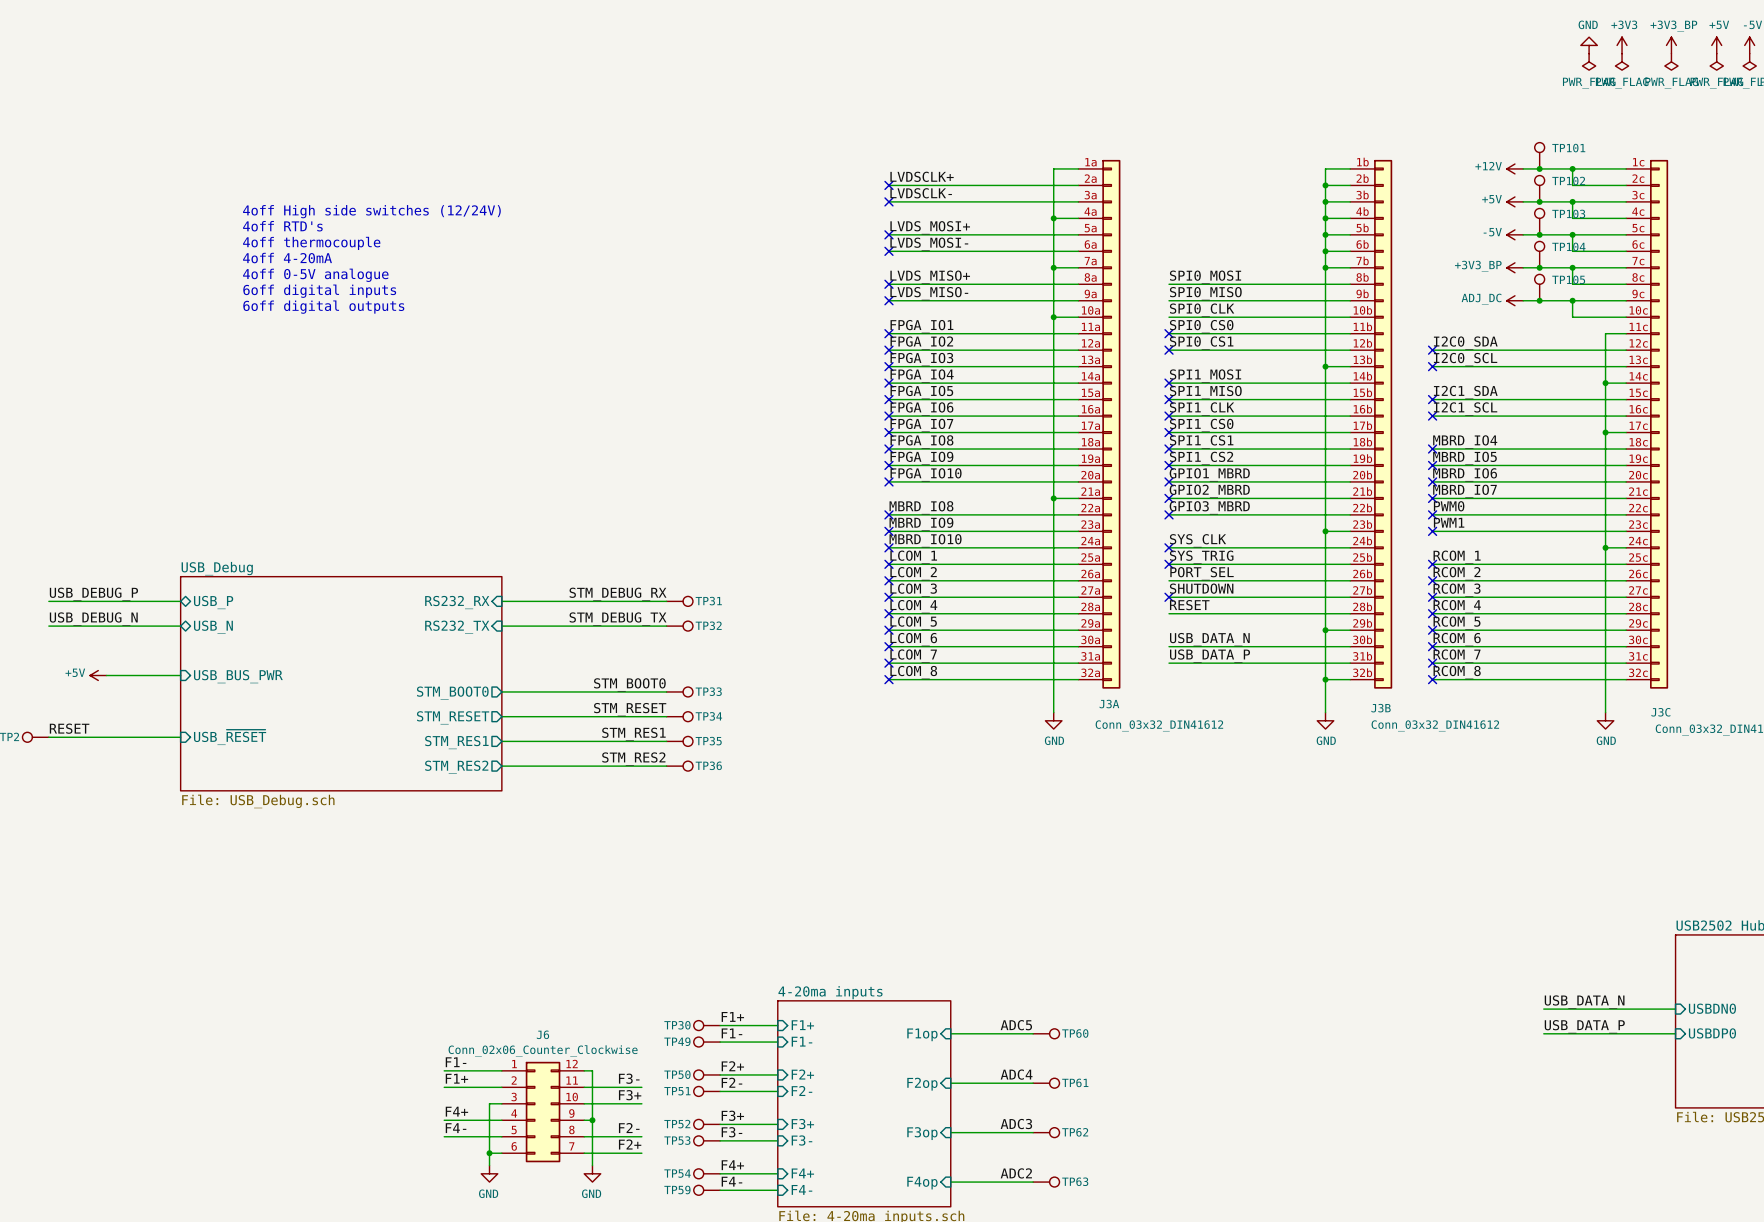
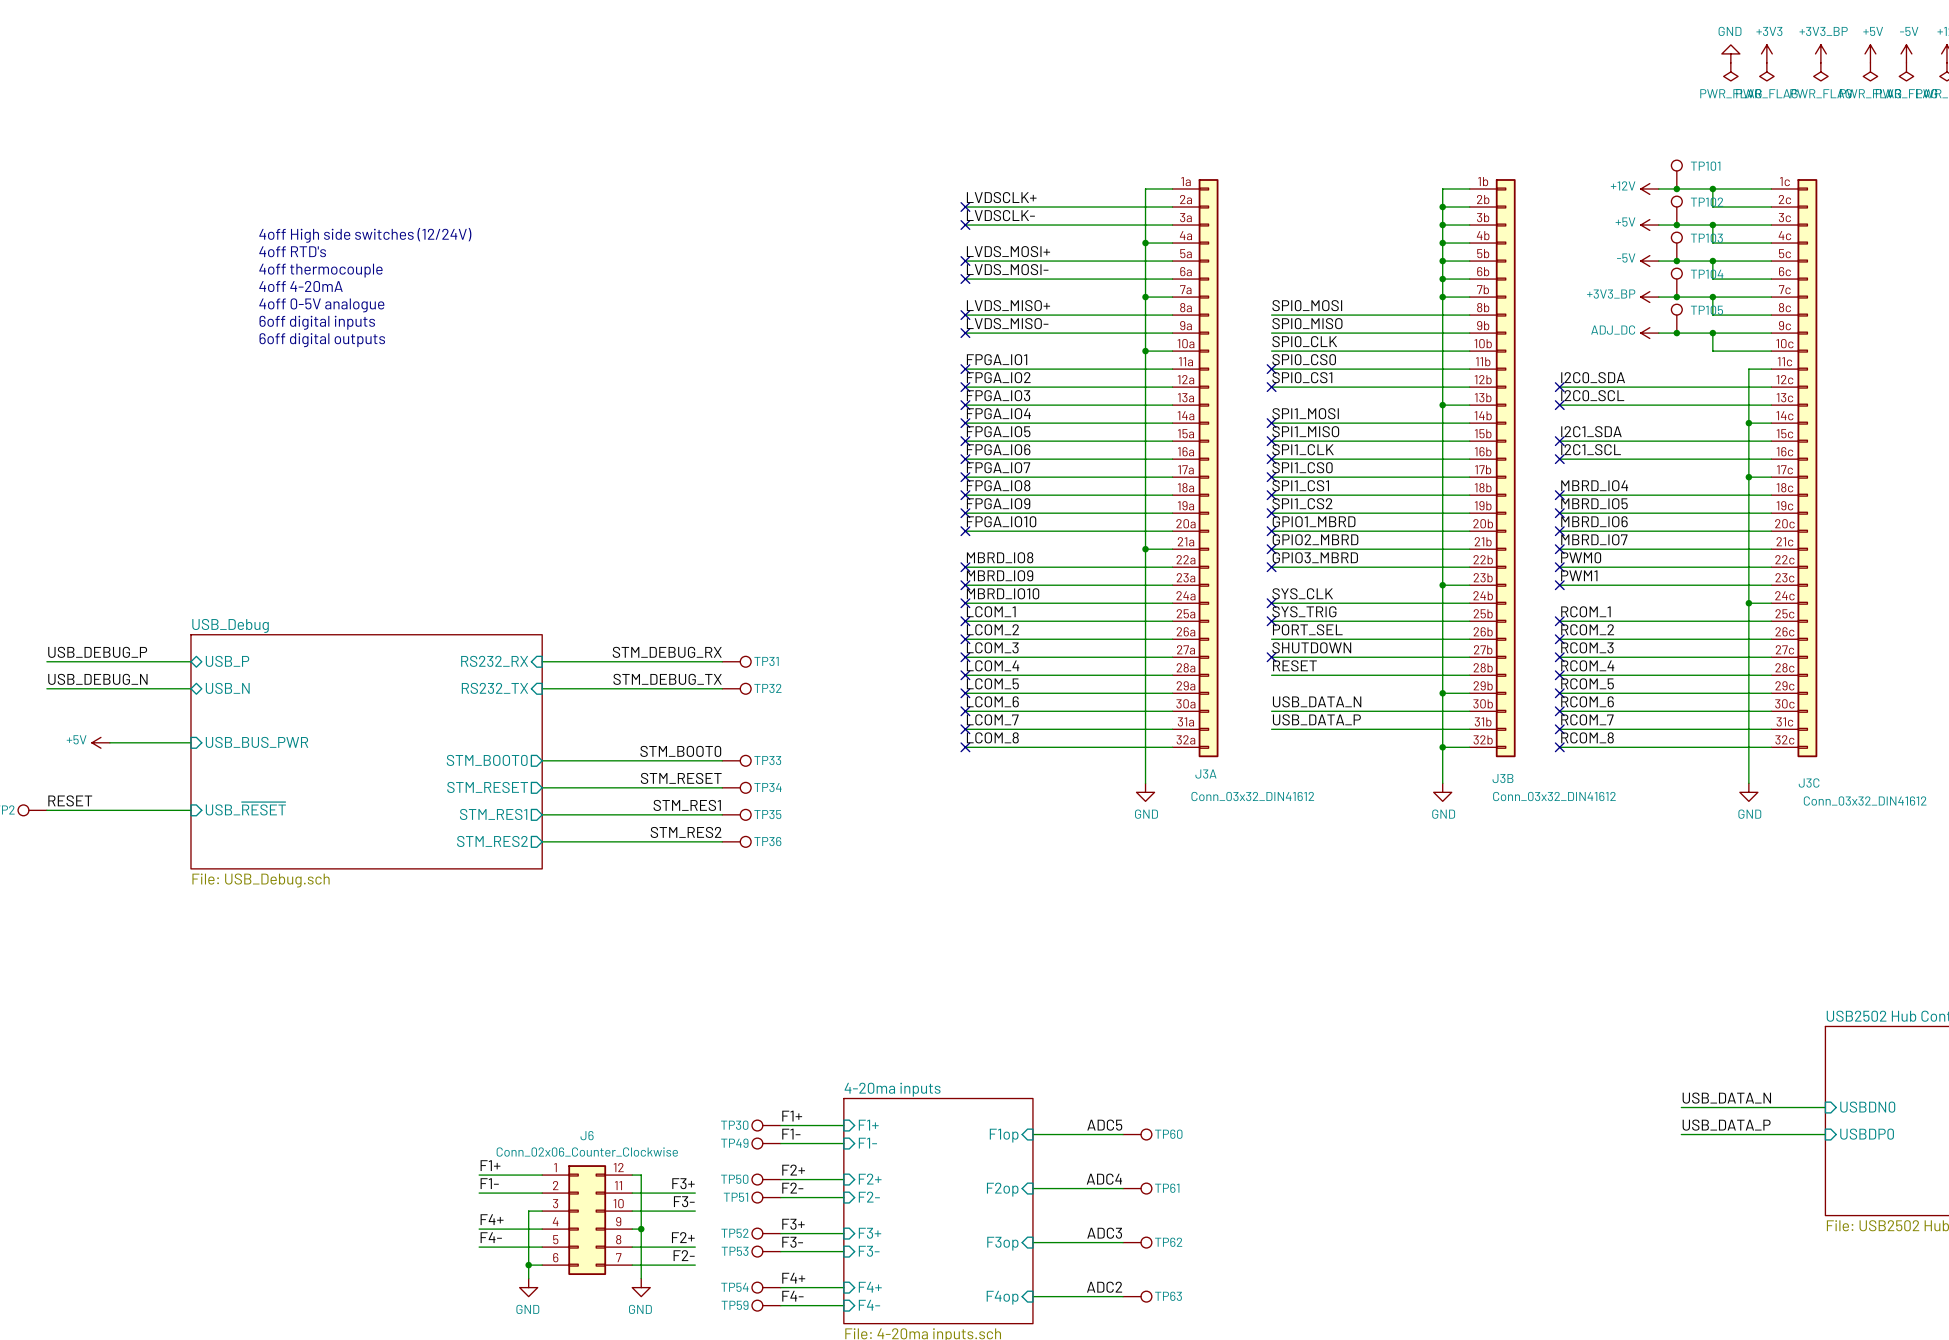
label: F1- (456, 1062) -> F1+ (490, 1165)
label: F1+ (456, 1078) -> F1- (489, 1183)
label: F3- (629, 1078) -> F3+ (683, 1183)
label: F3+ (630, 1095) -> F3- (684, 1201)
label: F2- (629, 1128) -> F2+ (683, 1237)
label: F2+ (630, 1144) -> F2- (684, 1255)

